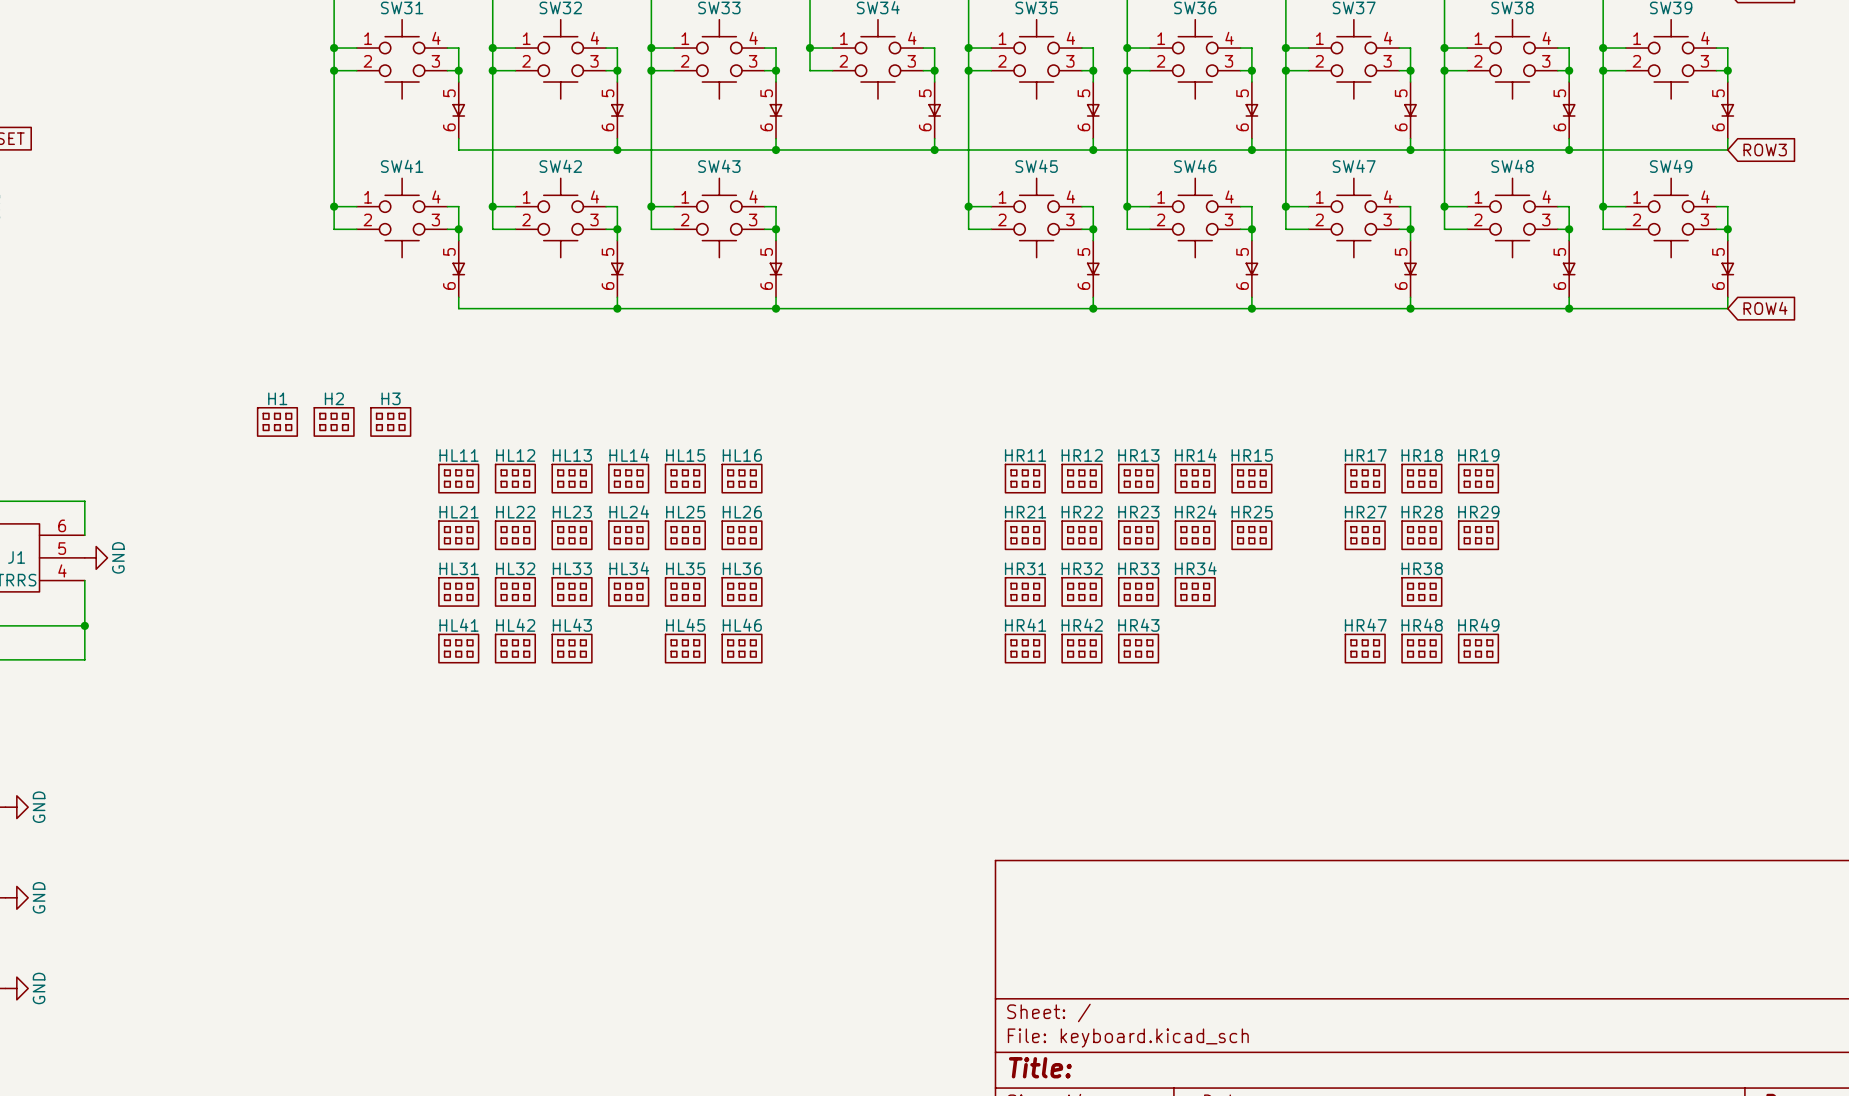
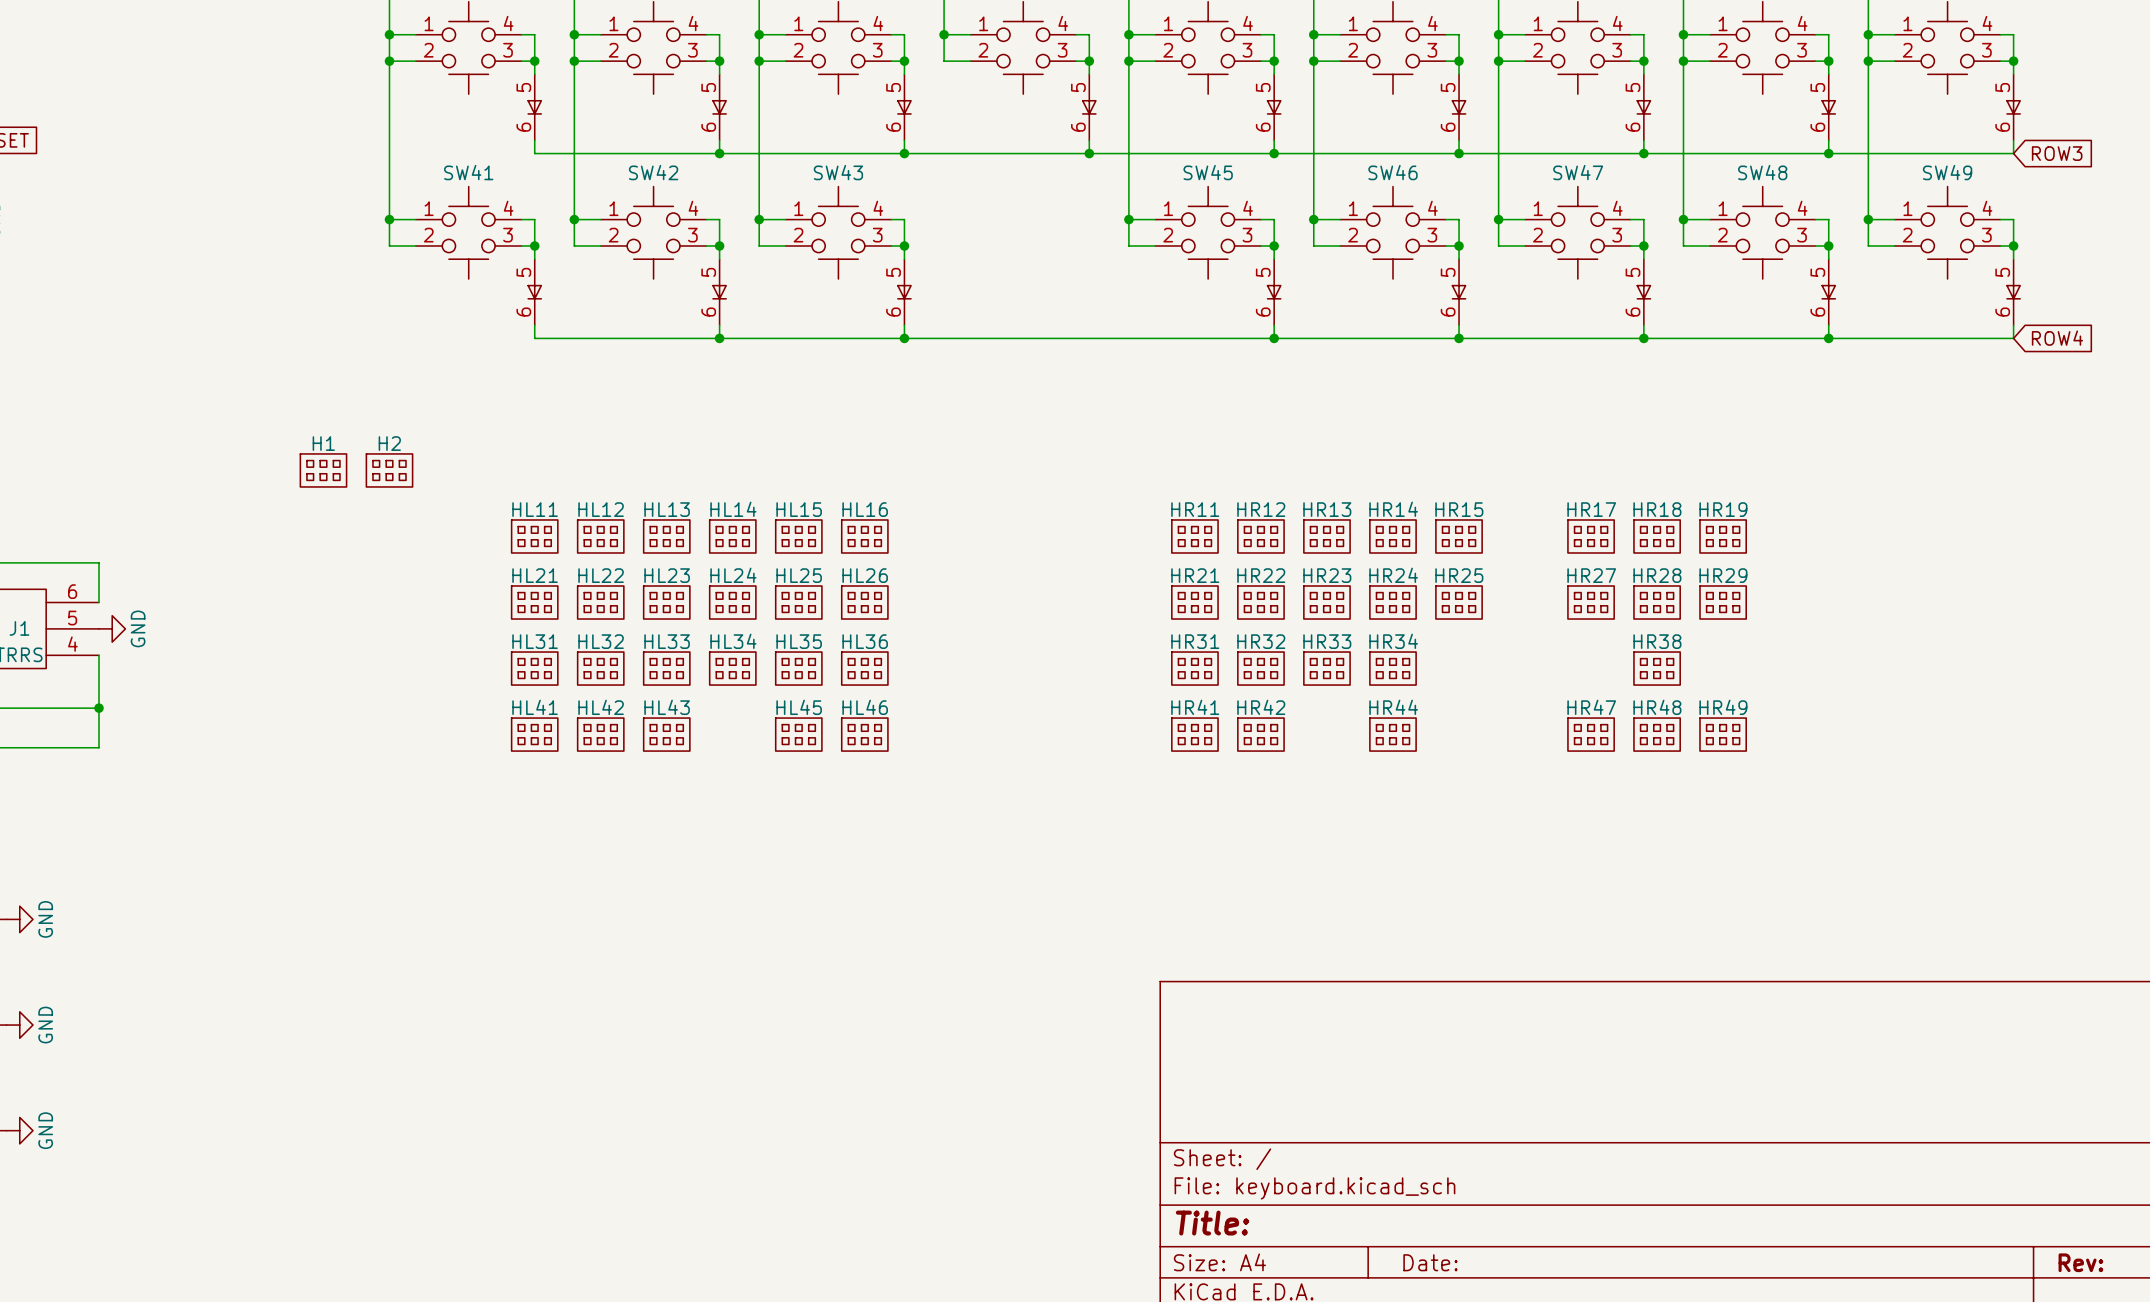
H3: (390, 421) -> none
HR43: (1138, 648) -> none
HR44: none -> (1393, 734)

